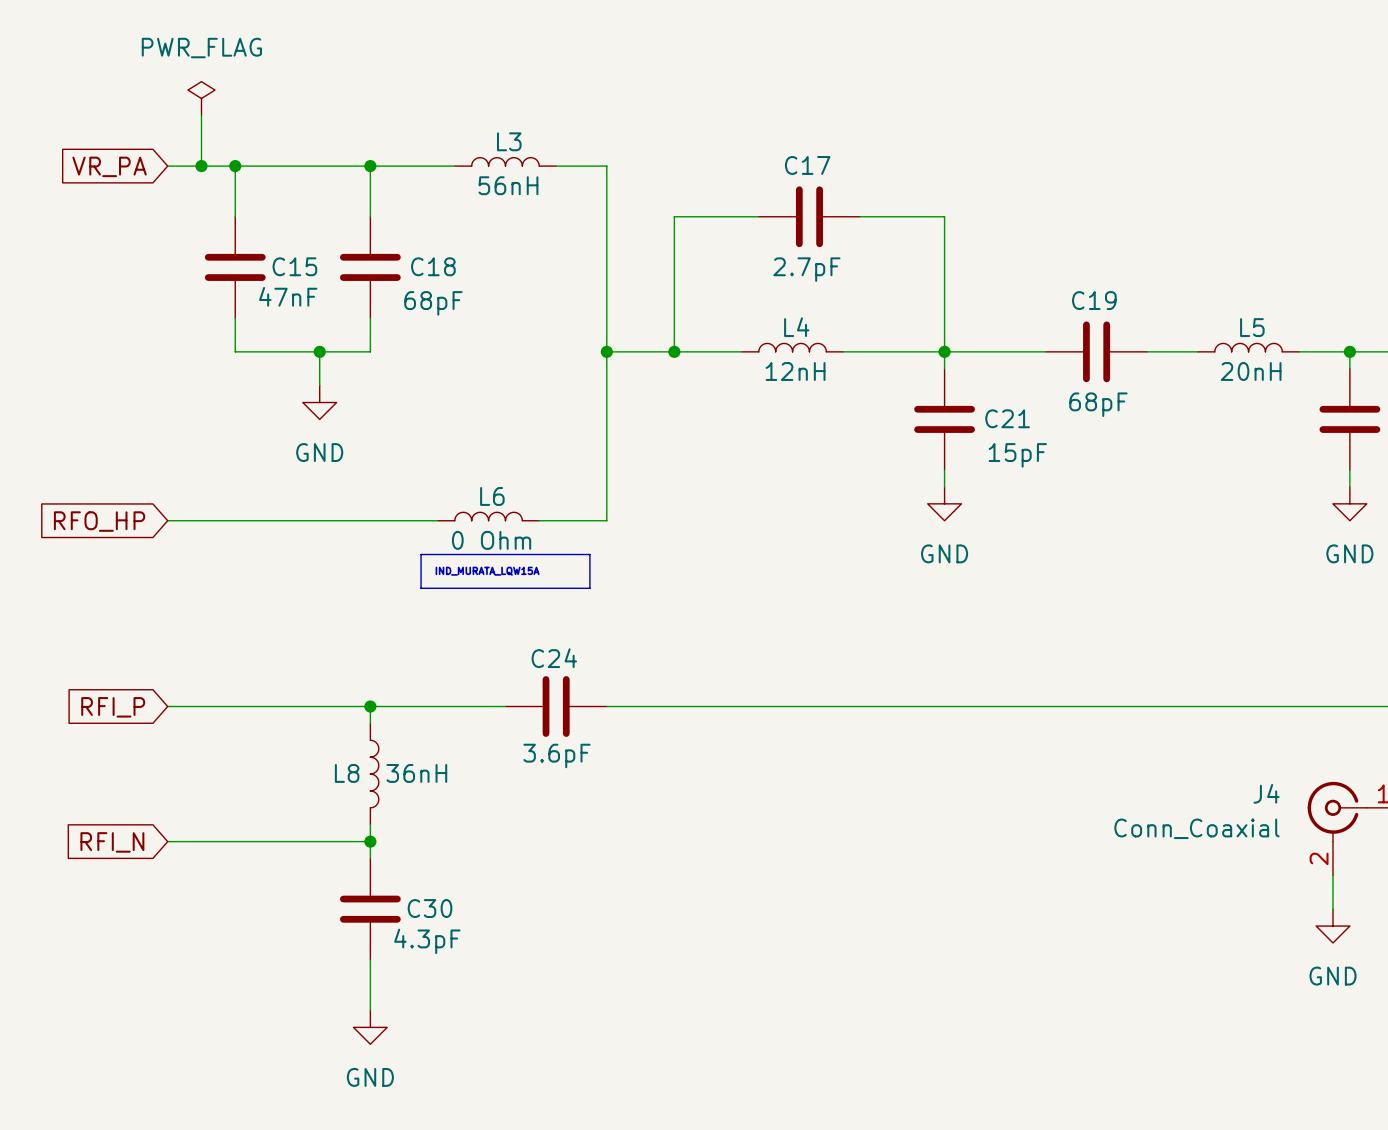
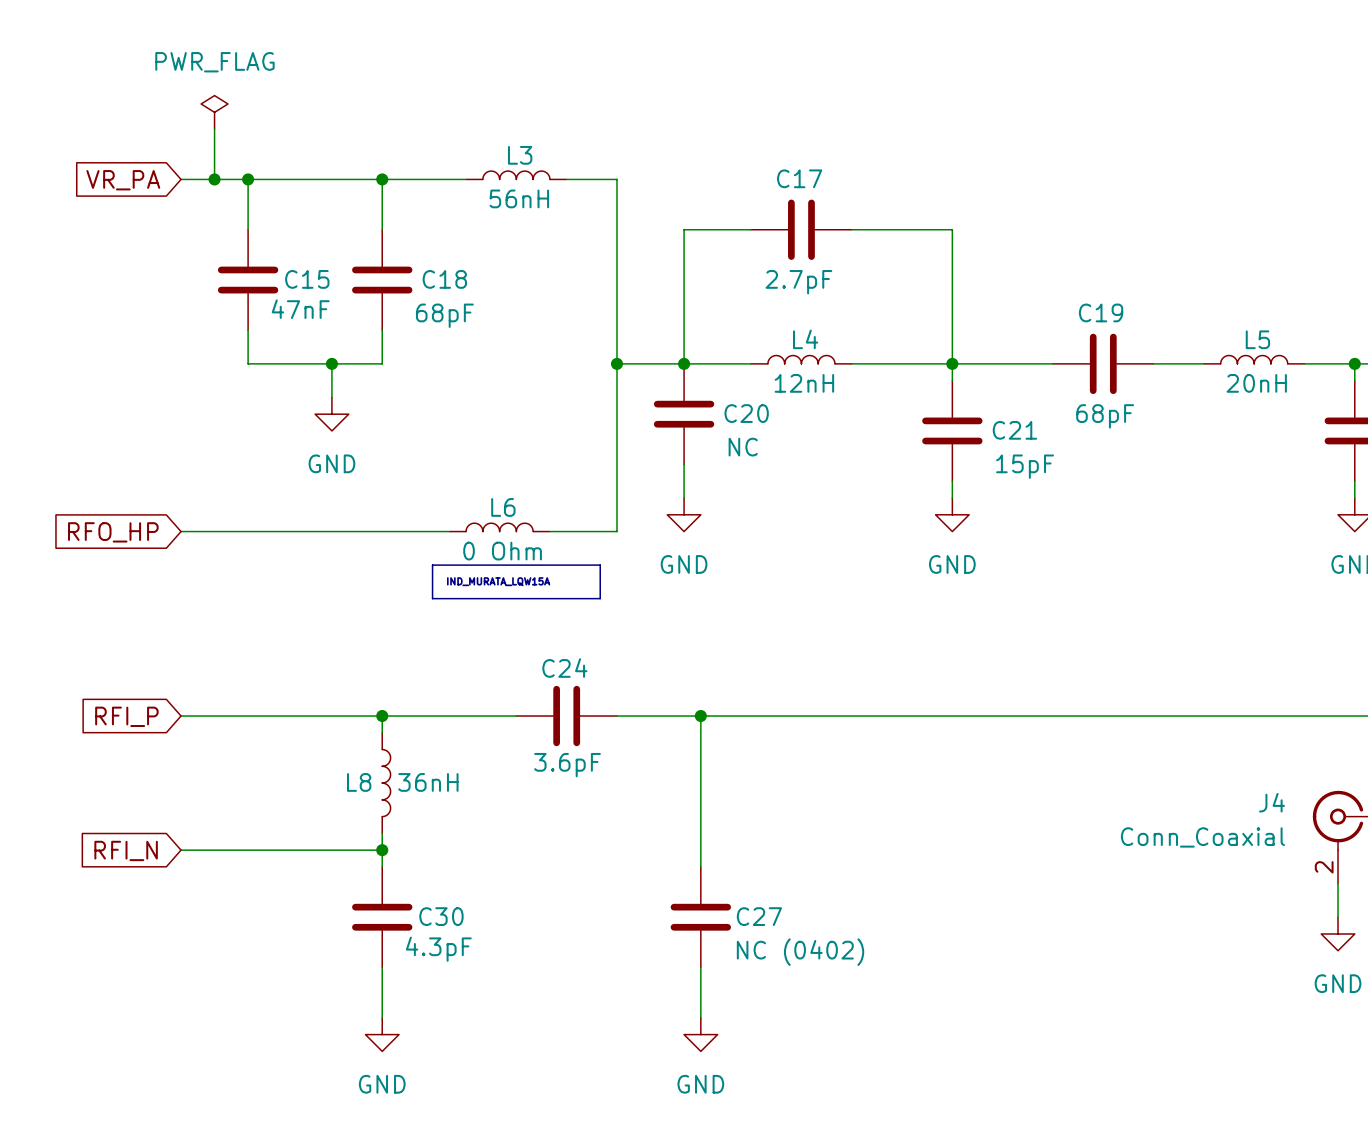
C17 position: (809, 216) -> (801, 229)
C20: none -> NC (684, 414)
wire: none -> (684, 464) (684, 498)
power symbol: none -> GND (684, 514)
wire: none -> (700, 716) (700, 866)
junction: none -> (700, 716)
C27: none -> NC (0402) (700, 917)
wire: none -> (700, 967) (700, 1017)
power symbol: none -> GND (700, 1034)

